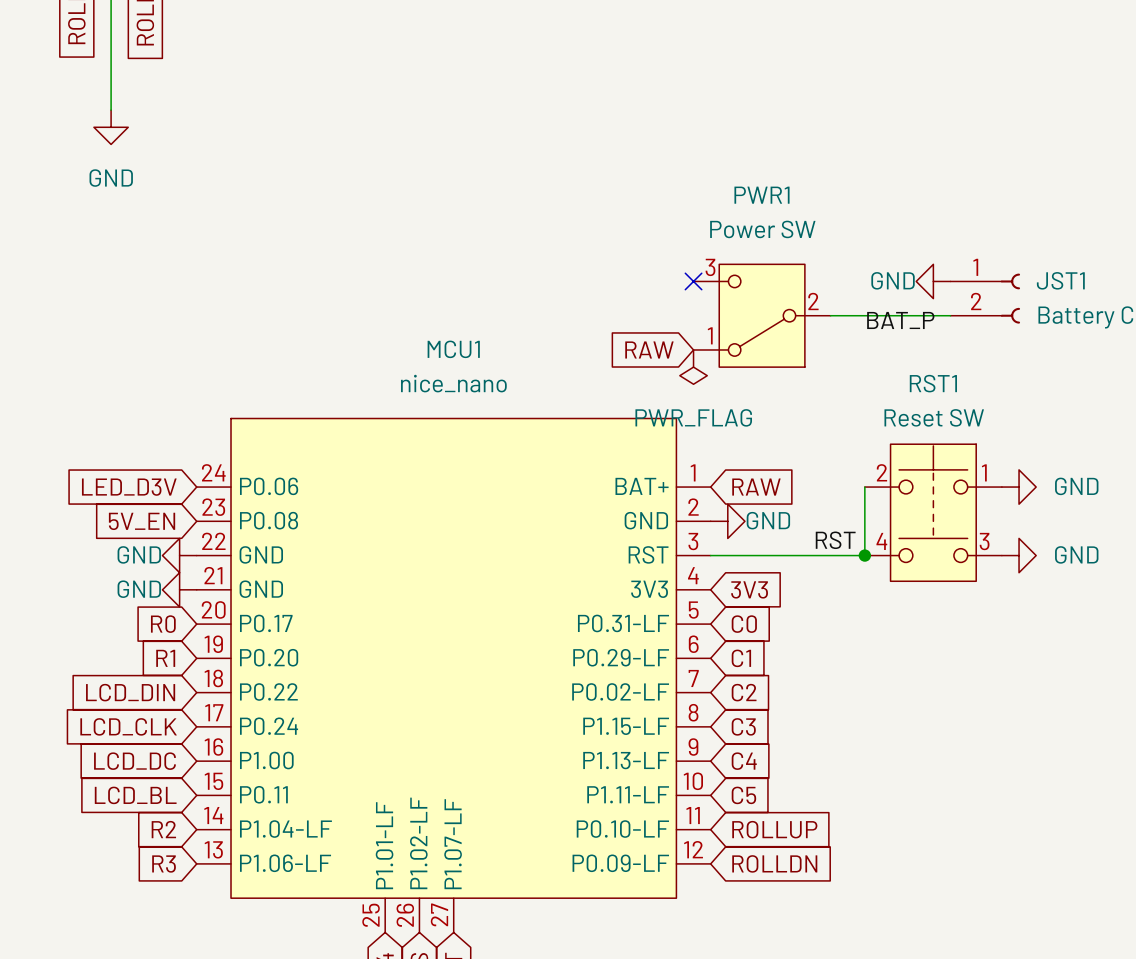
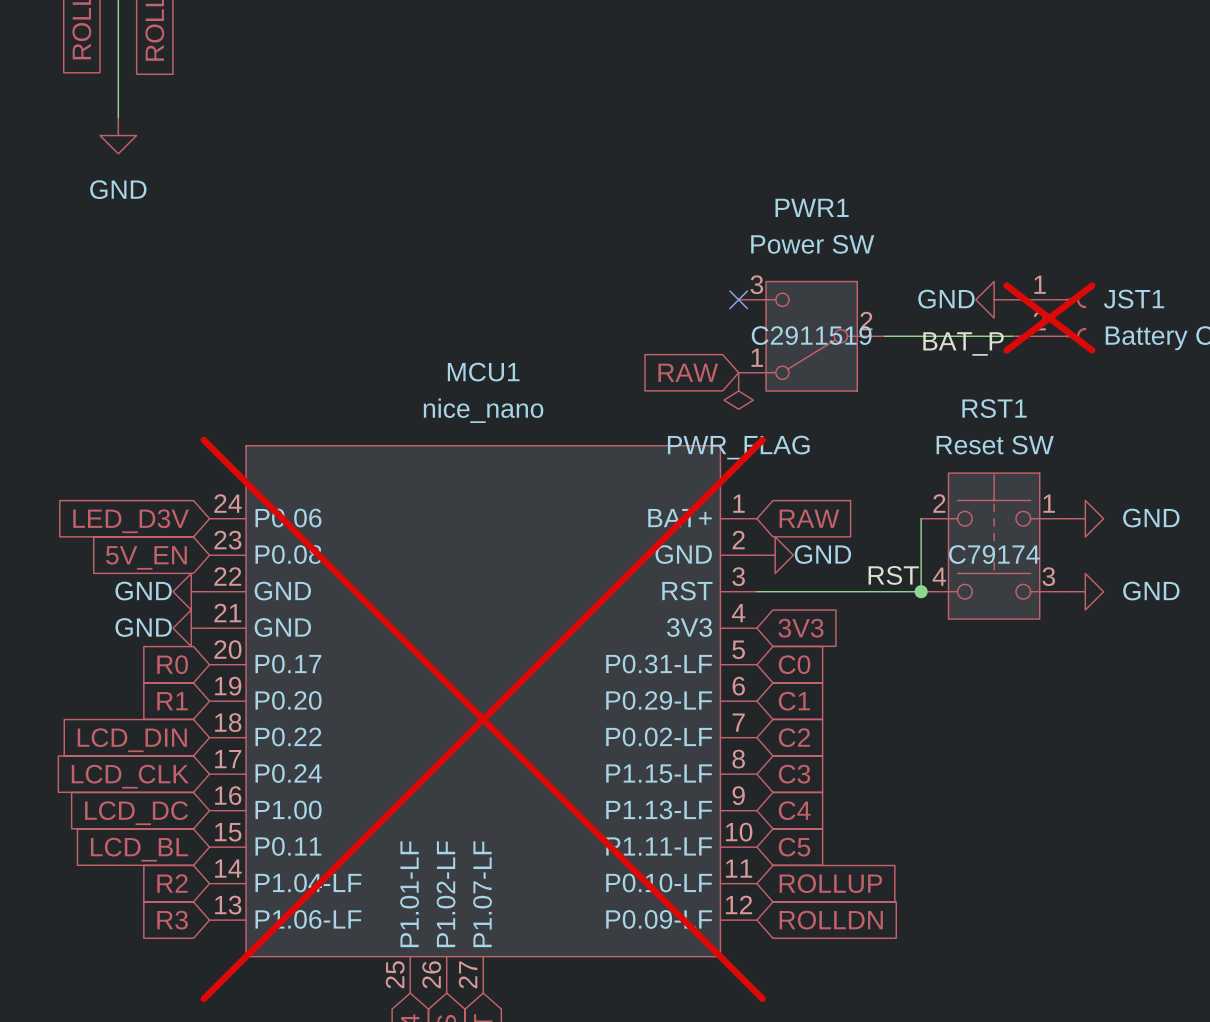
JST1 do-not-place cross: none -> (1049, 318)
PWR1 text: none -> C2911519 (811, 335)
RST1 text: none -> C79174 (994, 554)
MCU1 do-not-place cross: none -> (483, 719)

